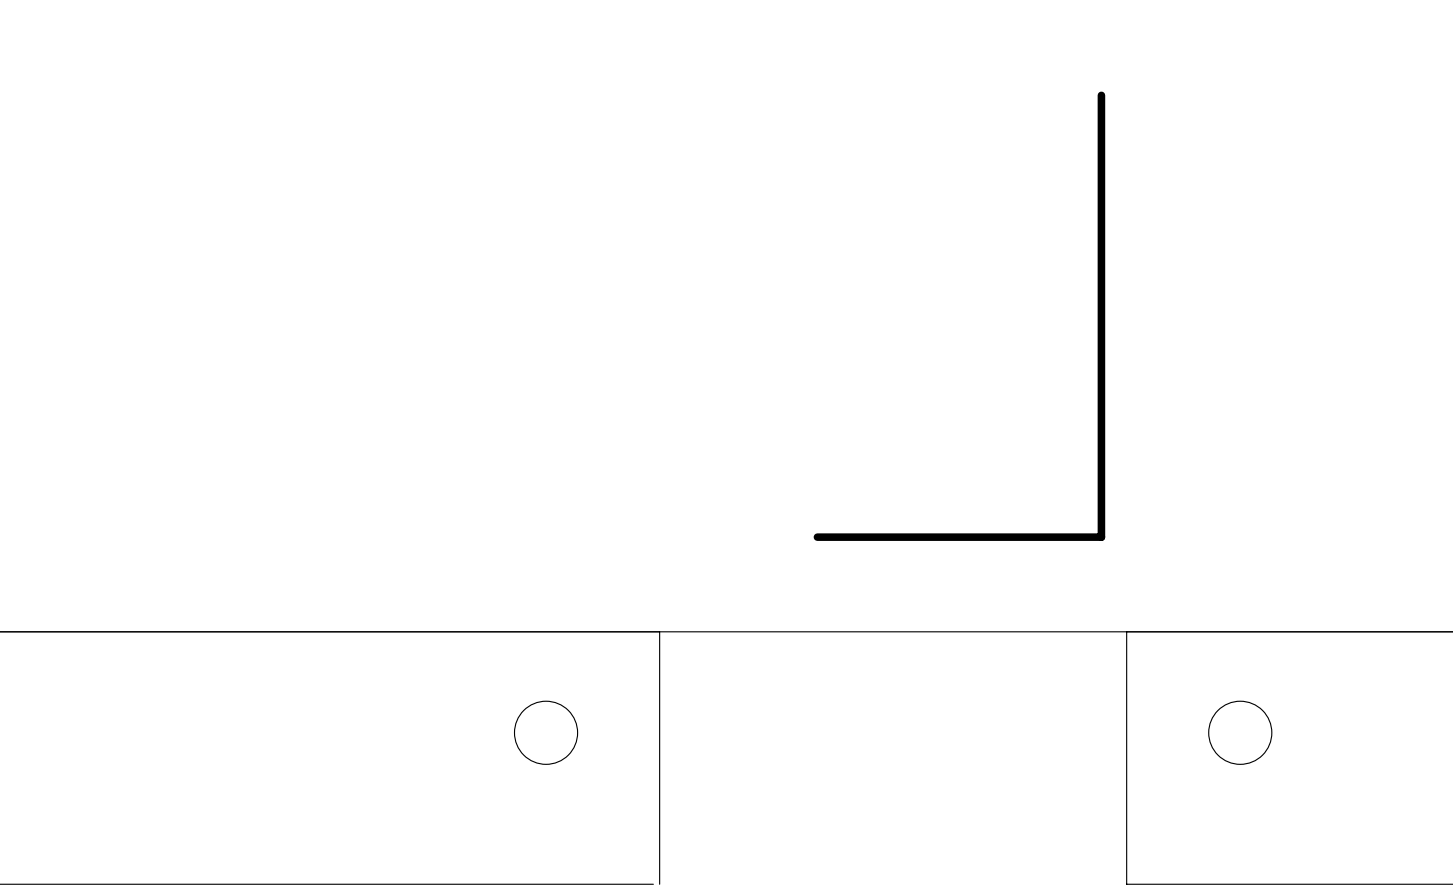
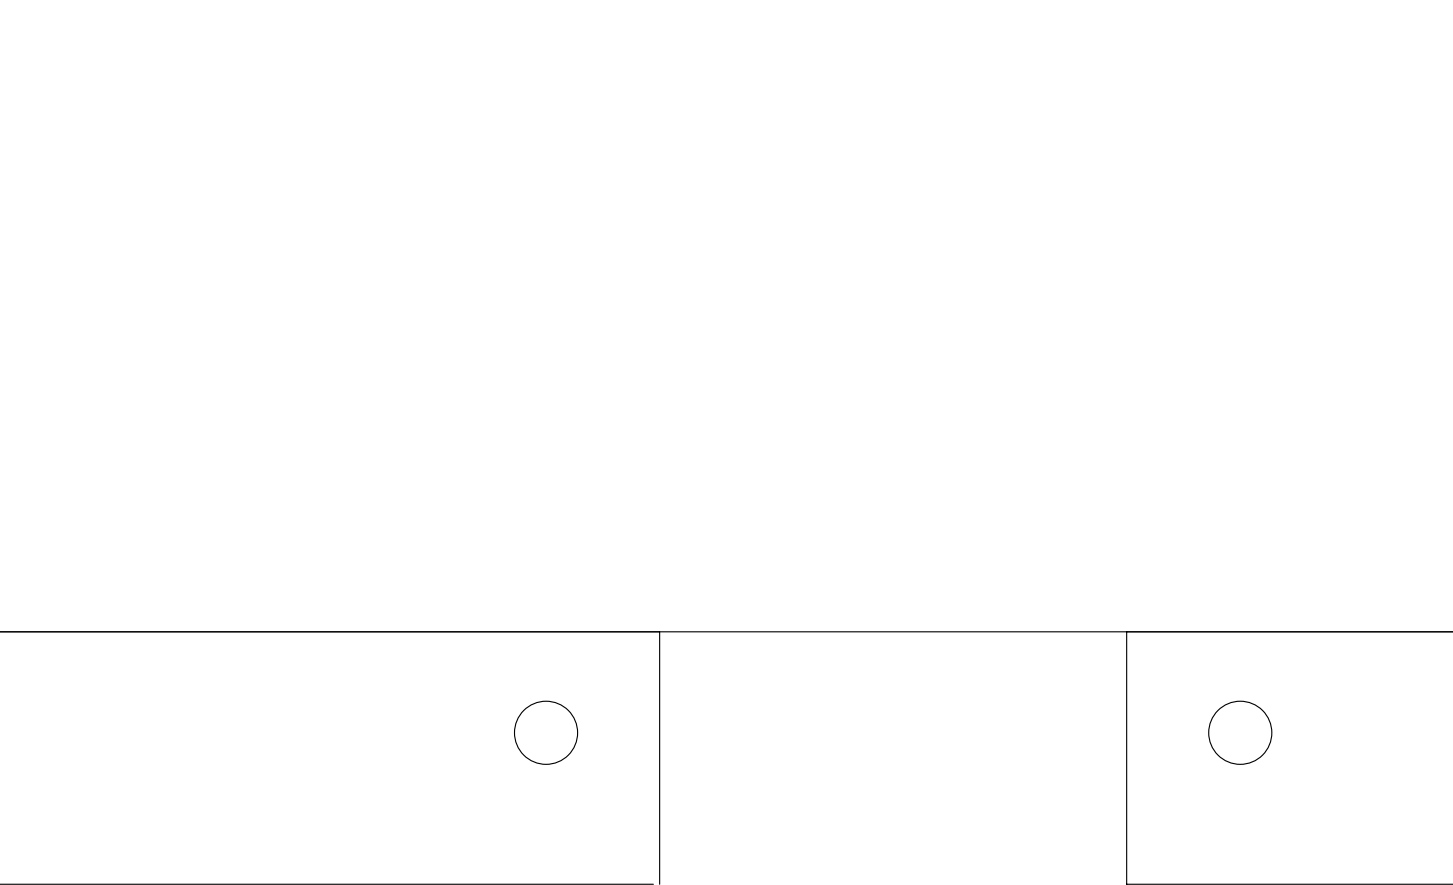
board edge: (1101, 95) (1101, 537) (817, 537) -> none

